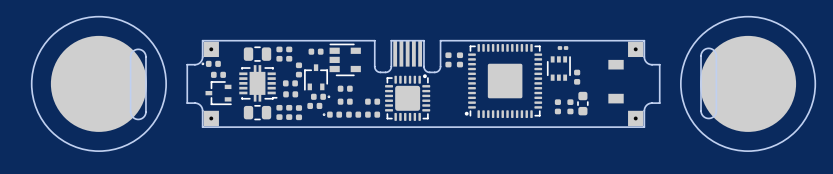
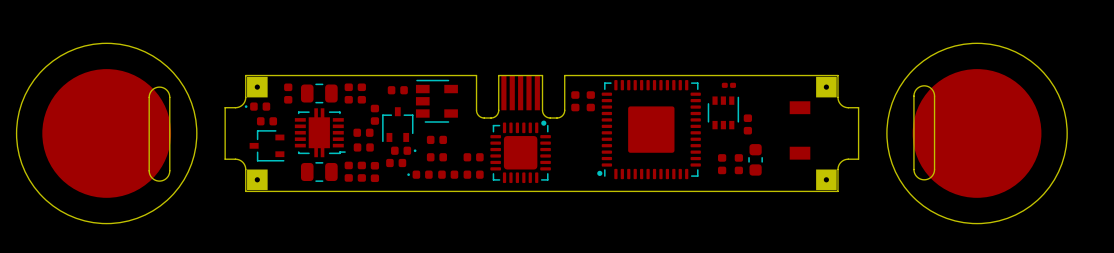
part: none -> (288, 93)

